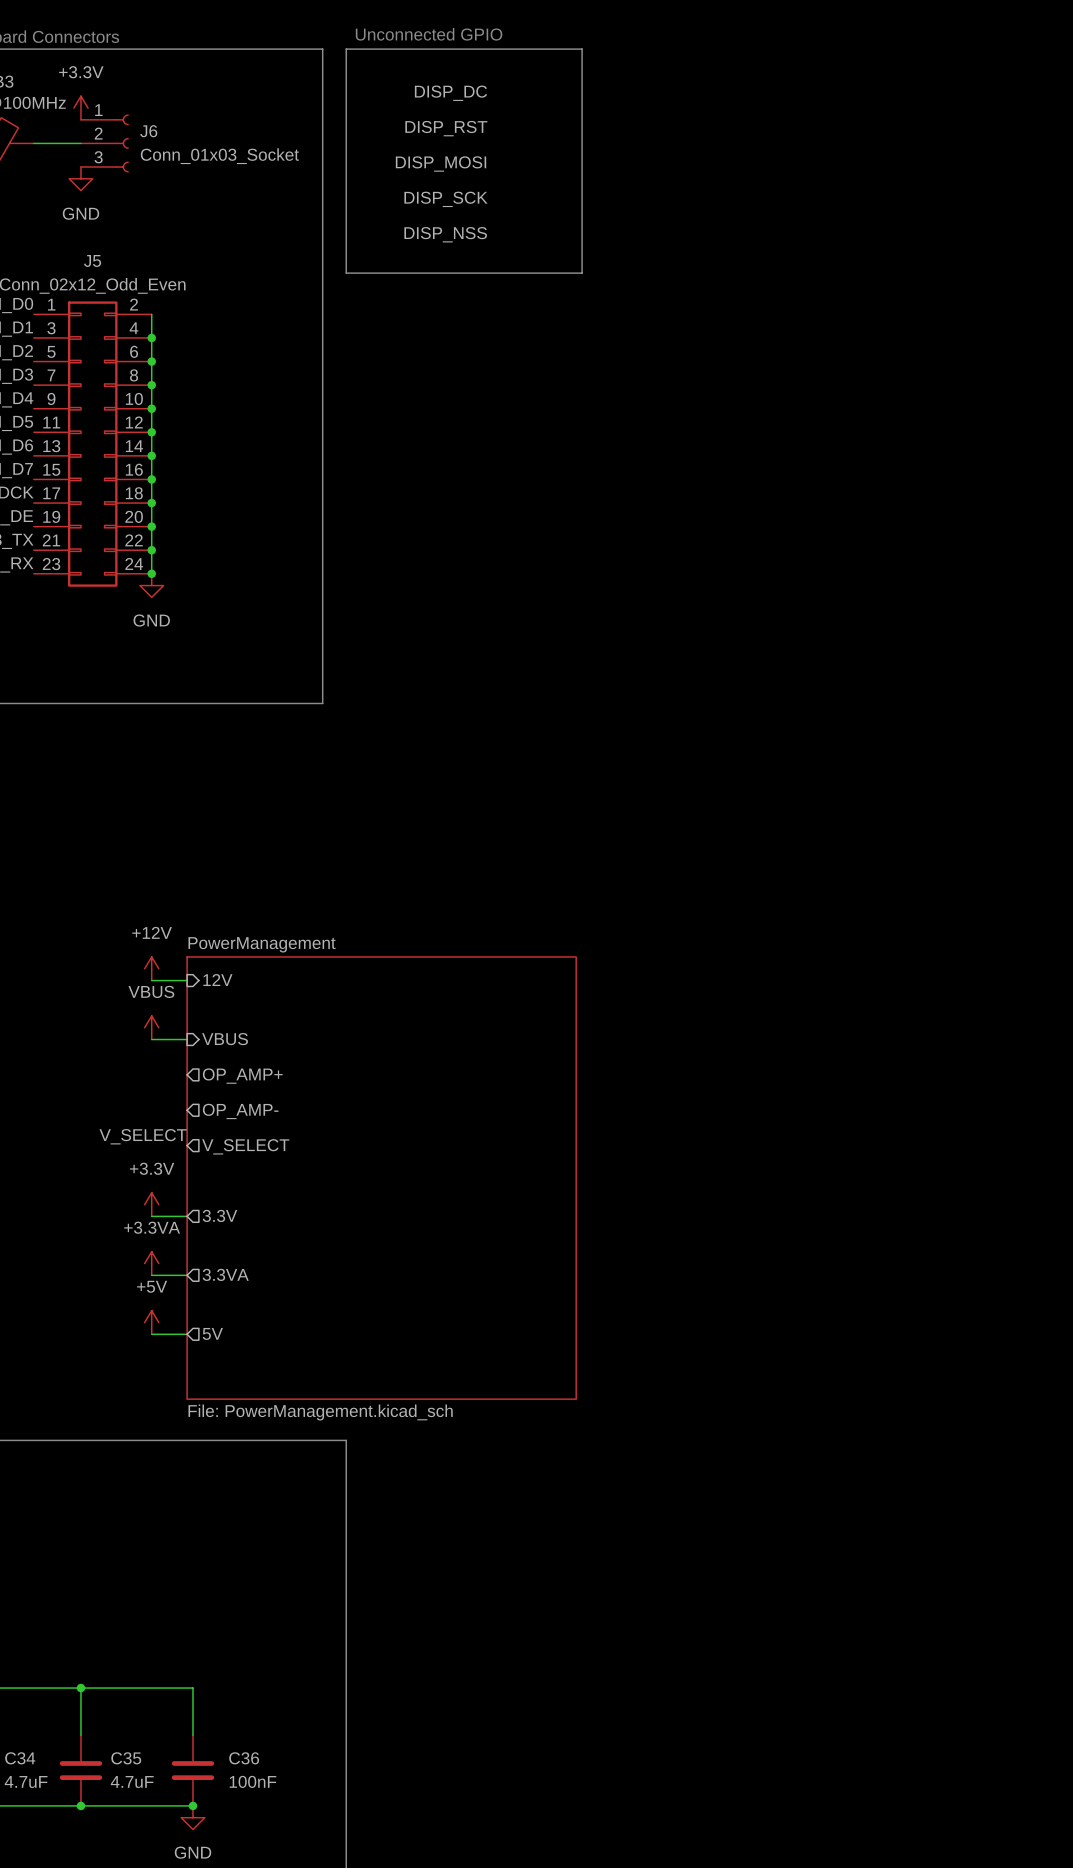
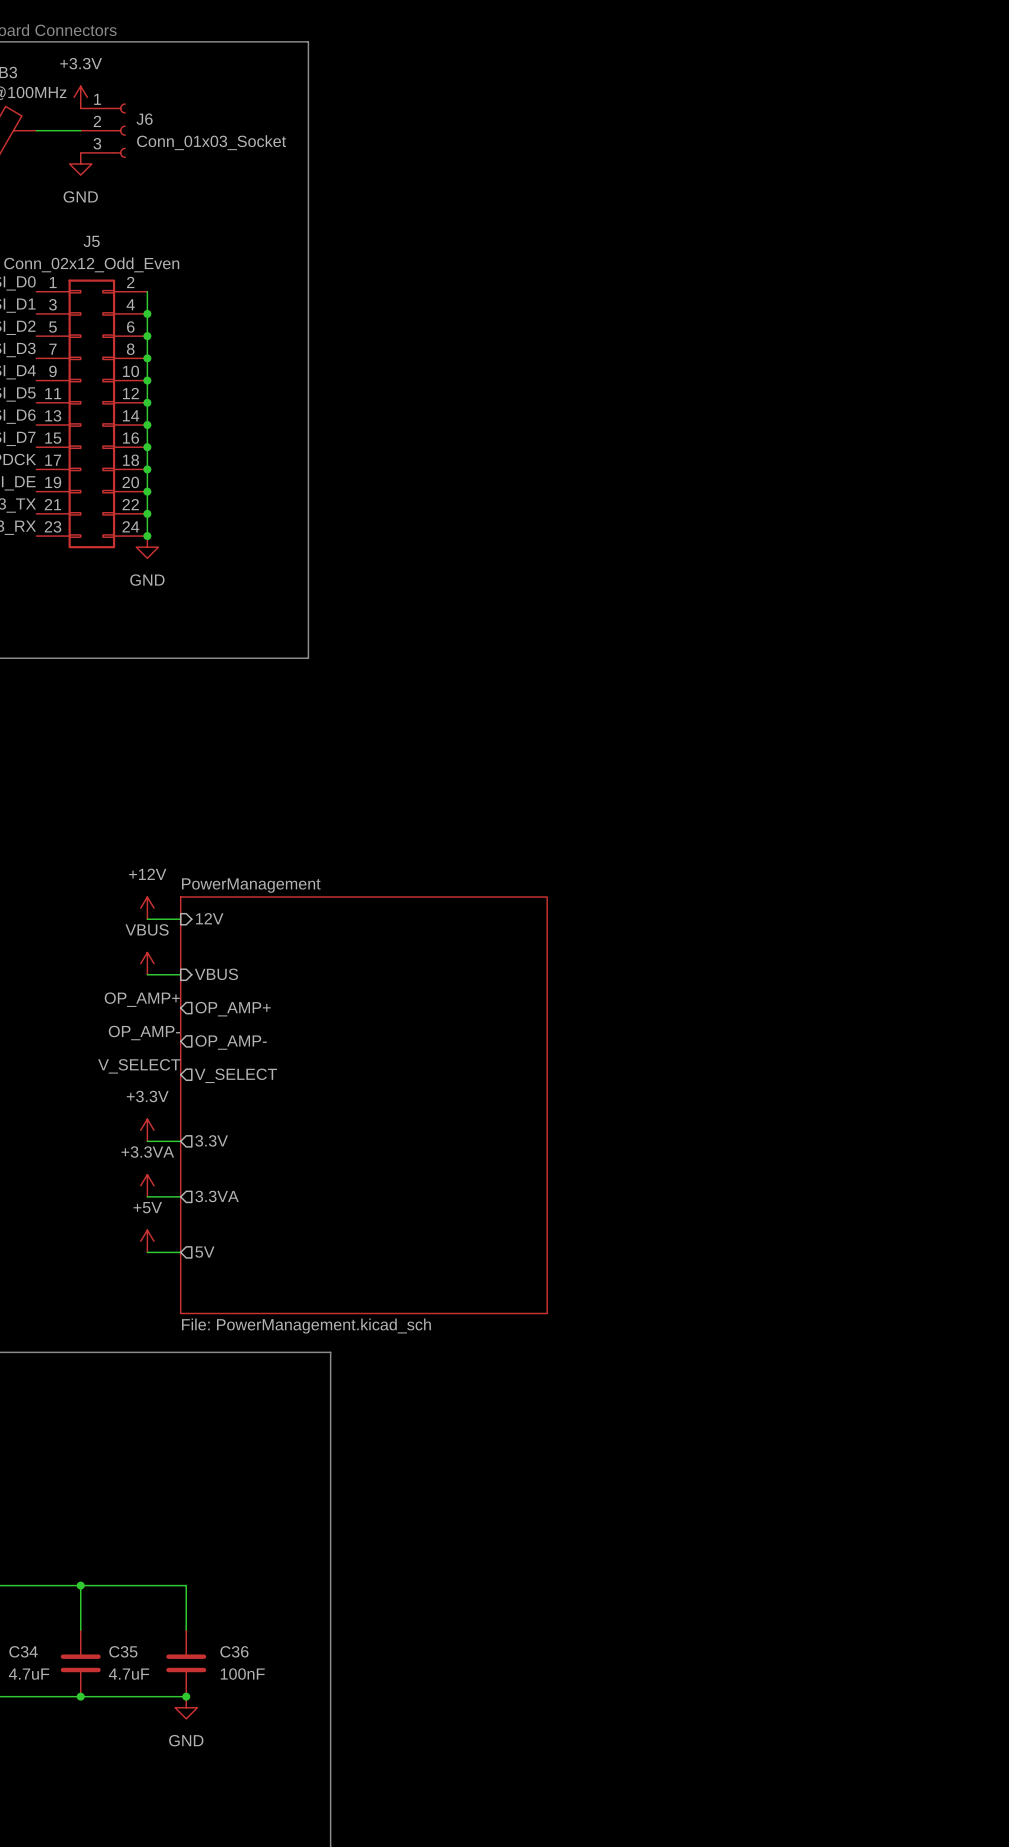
text: Unconnected GPIO (429, 34) -> none
line: (346, 49) (582, 49) (582, 273) (346, 273) (346, 49) -> none
label: DISP_DC (450, 93) -> none
label: DISP_RST (446, 128) -> none
label: DISP_MOSI (441, 163) -> none
label: DISP_SCK (445, 199) -> none
label: DISP_NSS (445, 234) -> none
label: none -> OP_AMP+ (142, 999)
label: none -> OP_AMP- (144, 1033)

